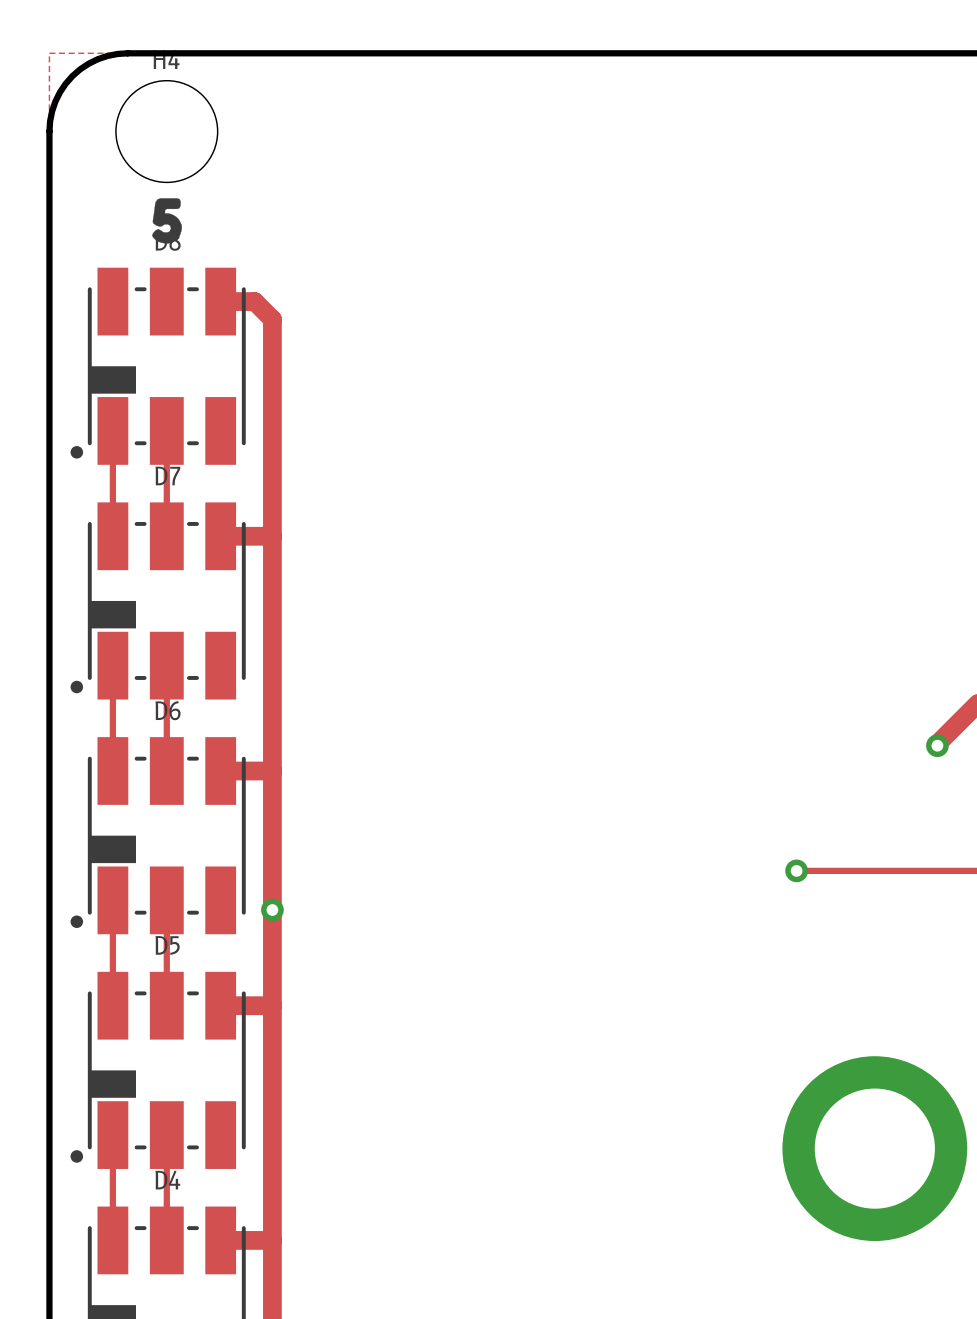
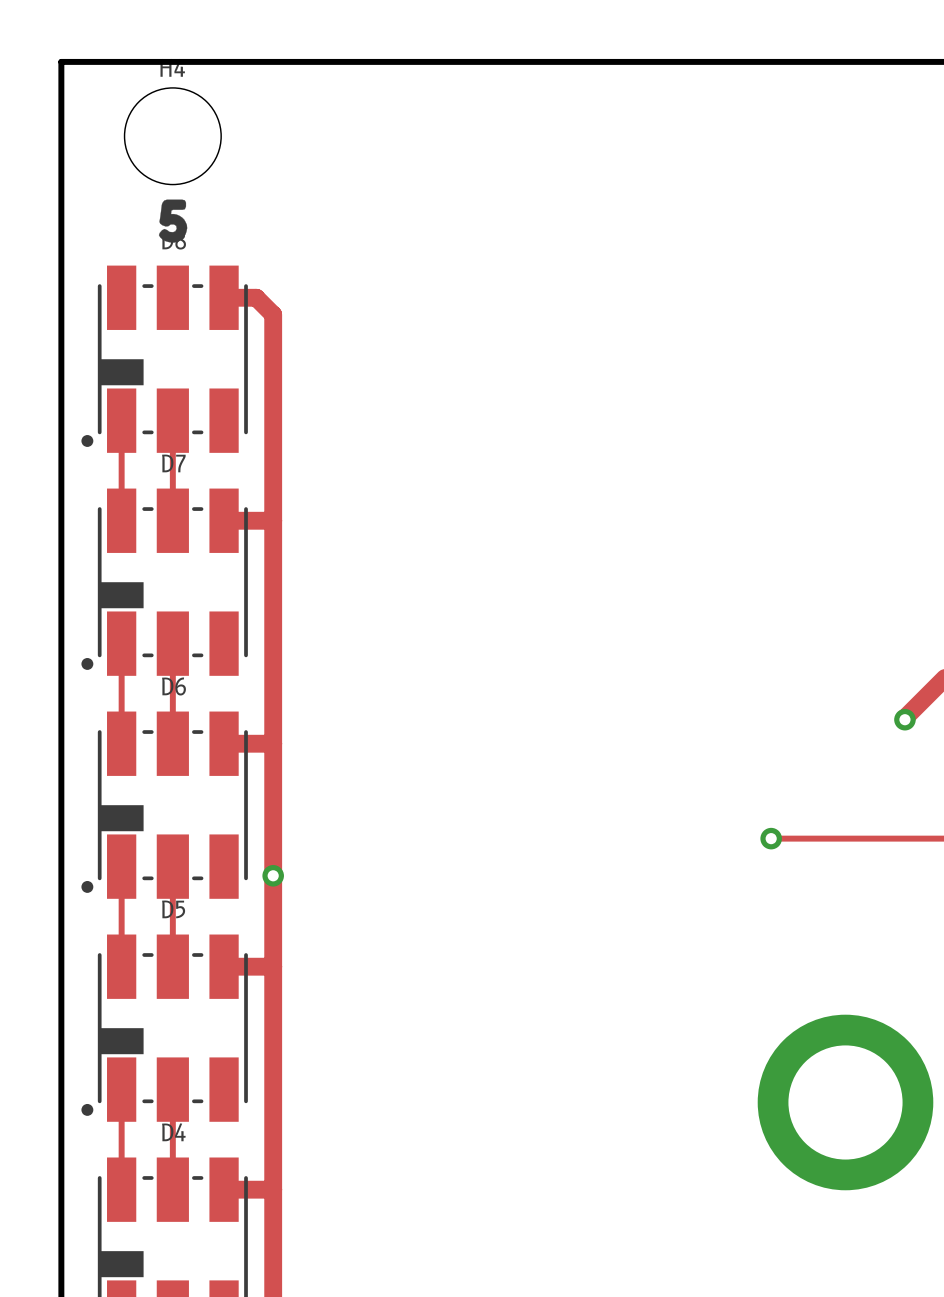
board edge: (127, 53) (97, 59) (72, 76) (55, 101) (49, 131) -> (135, 61) (61, 61) (61, 136)

